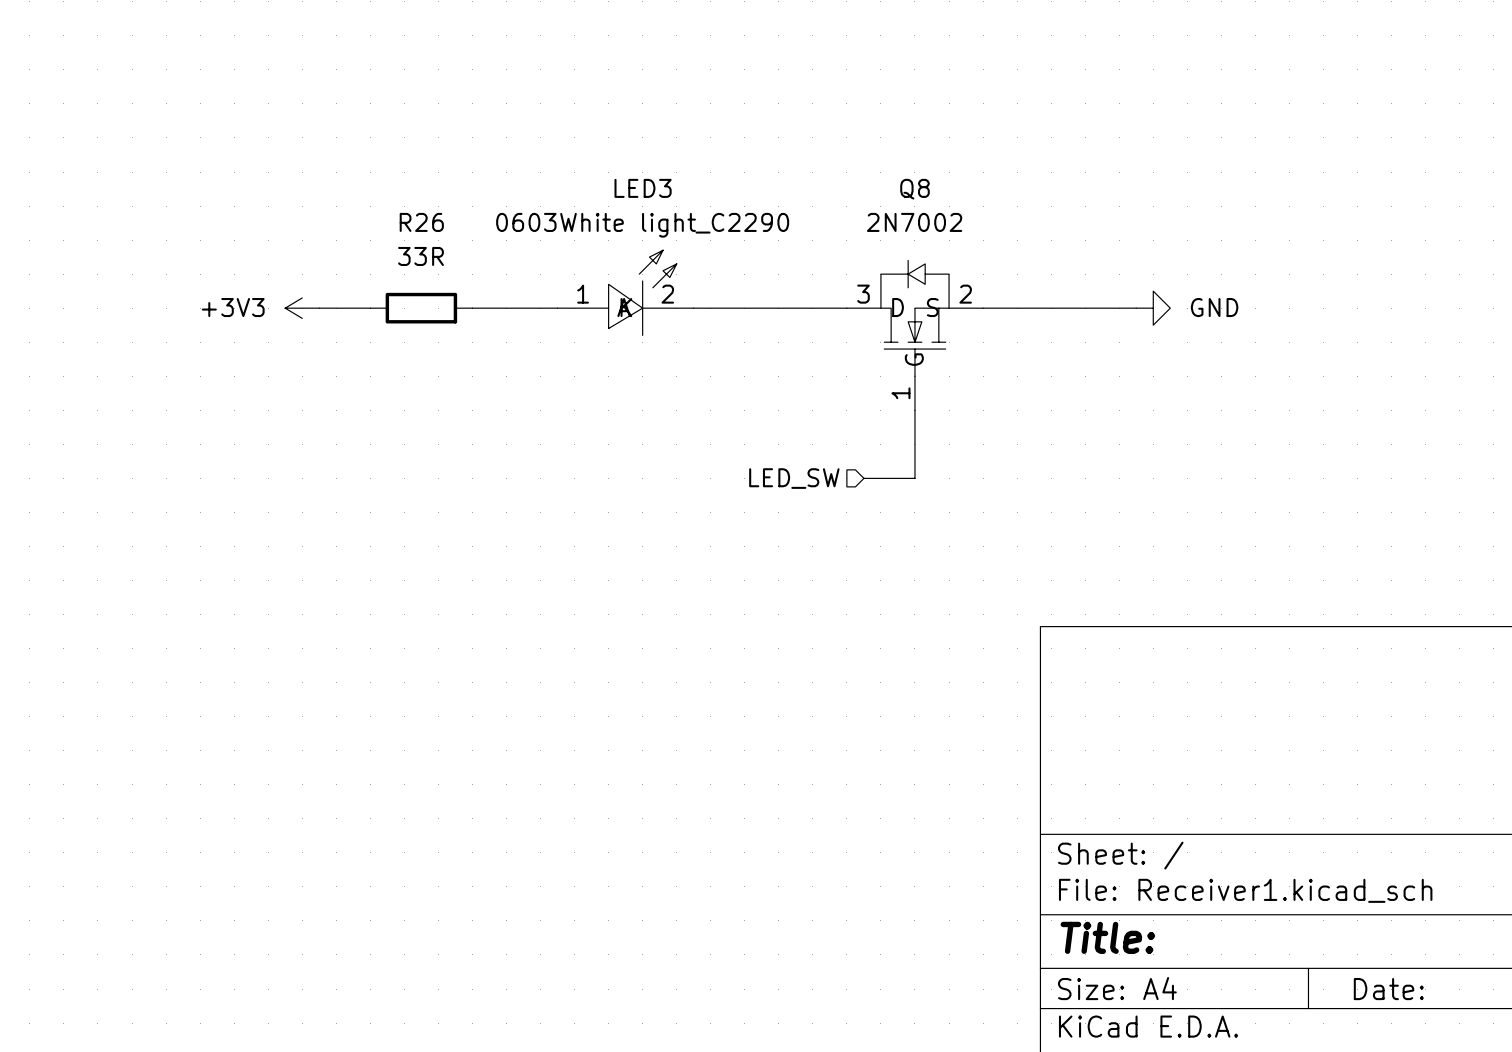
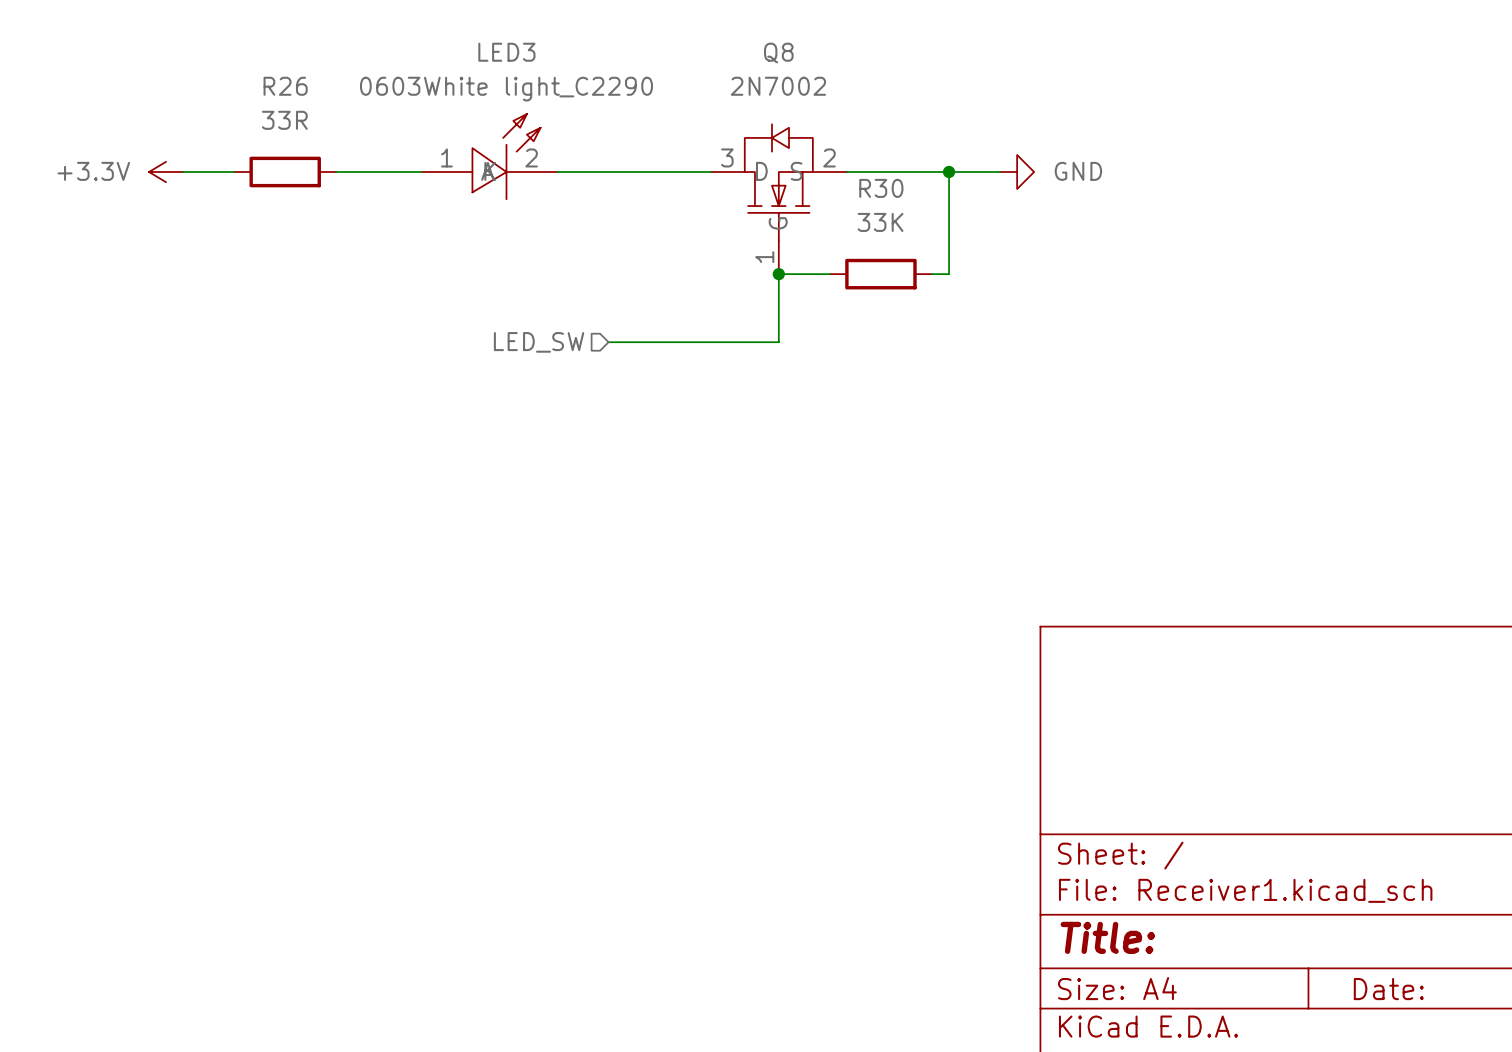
power symbol: none -> +3.3V (166, 172)
wire: none -> (949, 172) (949, 274) (932, 274)
junction: none -> (949, 172)
junction: none -> (778, 274)
wire: none -> (829, 274) (778, 274) (778, 342) (608, 342)
R30: none -> 33K (880, 274)
LED3 position: (625, 292) -> (489, 156)
power symbol: +3V3 (302, 308) -> none
wire: (319, 308) (370, 308) -> (183, 172) (234, 172)
R26 position: (421, 308) -> (285, 172)
wire: (472, 308) (557, 308) -> (336, 172) (421, 172)
wire: (693, 308) (846, 308) -> (557, 172) (710, 172)
wire: (983, 308) (1136, 308) -> (846, 172) (1000, 172)
power symbol position: GND (1153, 308) -> GND (1017, 172)
Q8 position: (914, 335) -> (778, 199)
wire: (914, 410) (914, 478) (863, 478) -> none
hierarchical label position: LED_SW (794, 478) -> LED_SW (539, 342)

